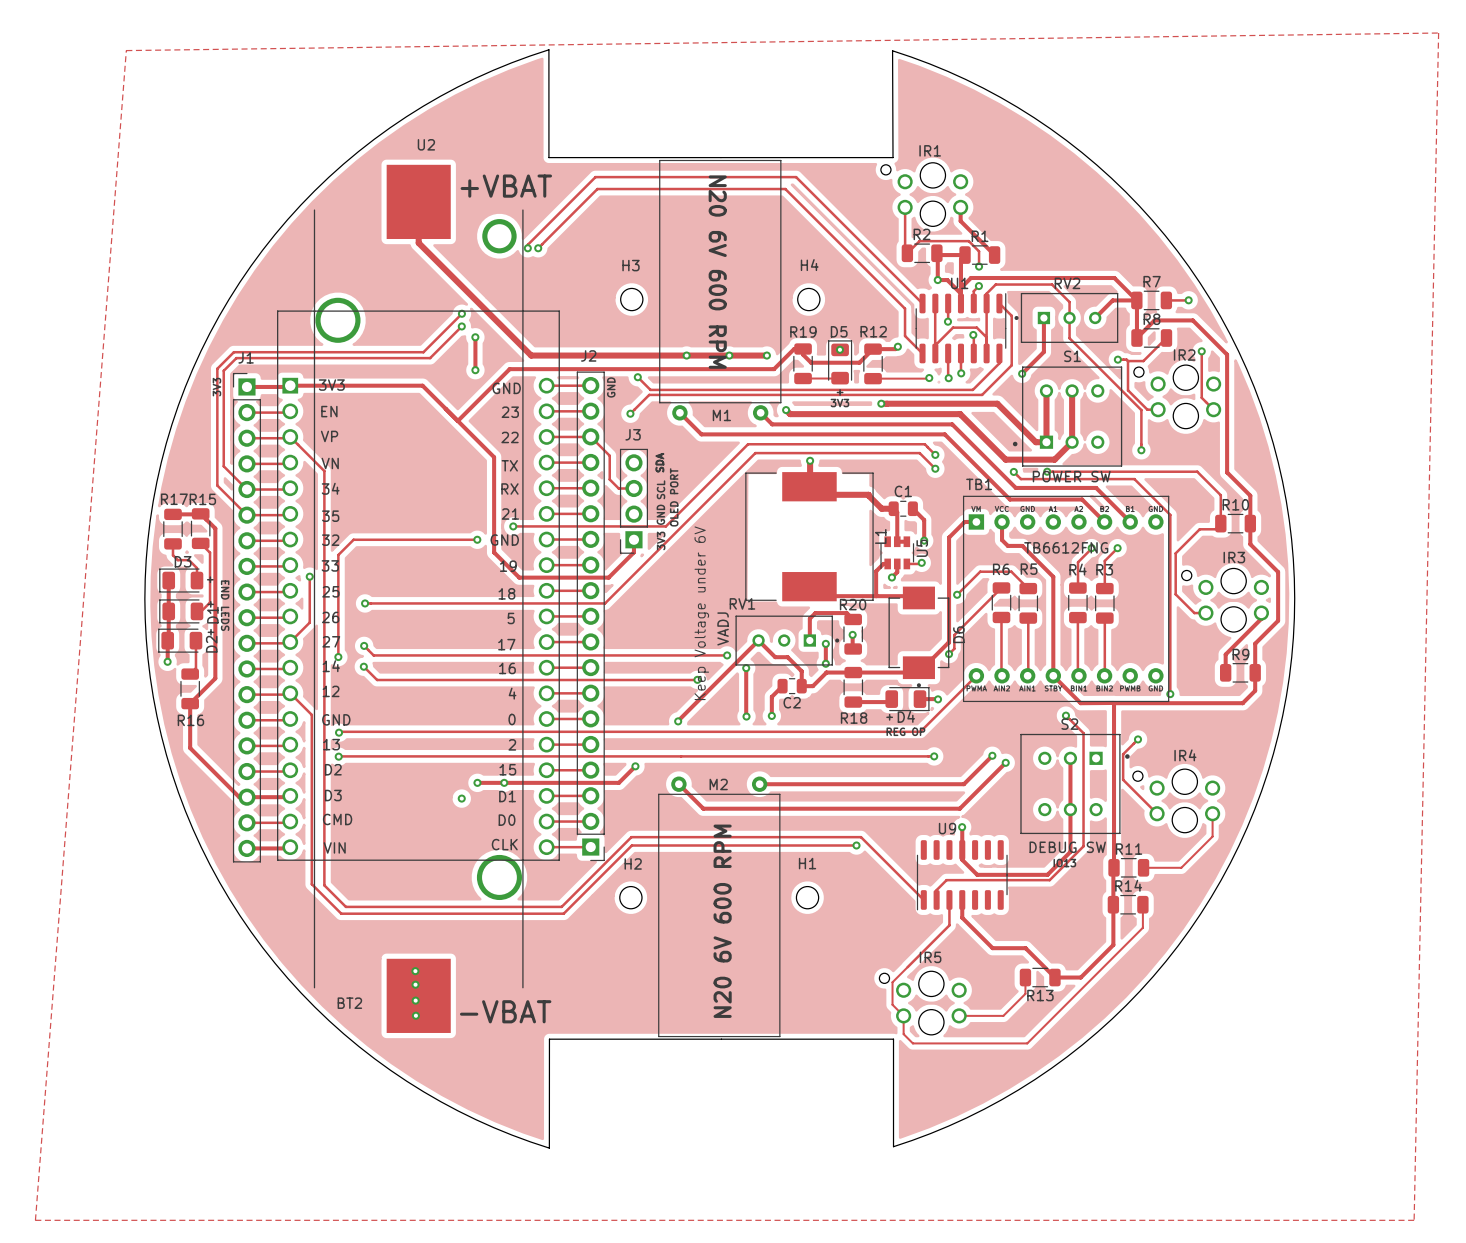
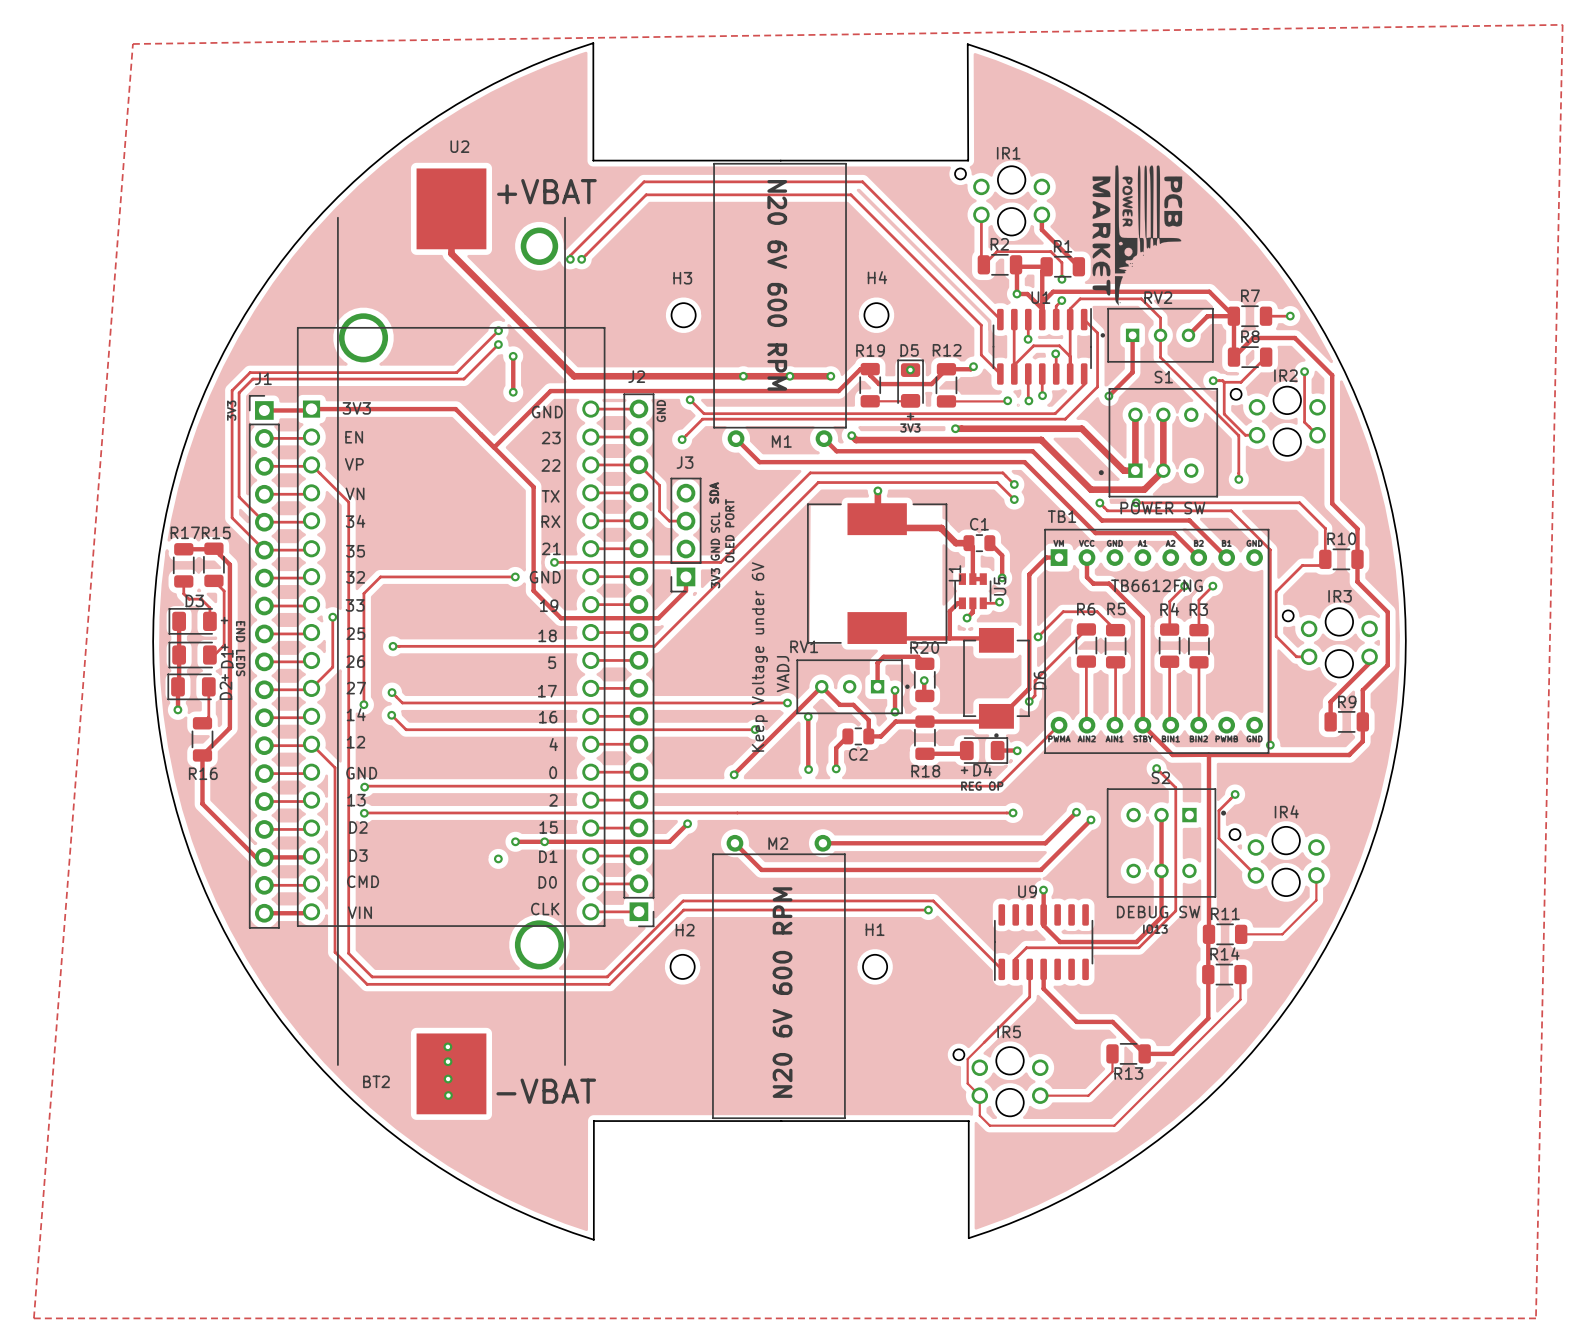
drawing: none -> [1092, 165, 1183, 306]

